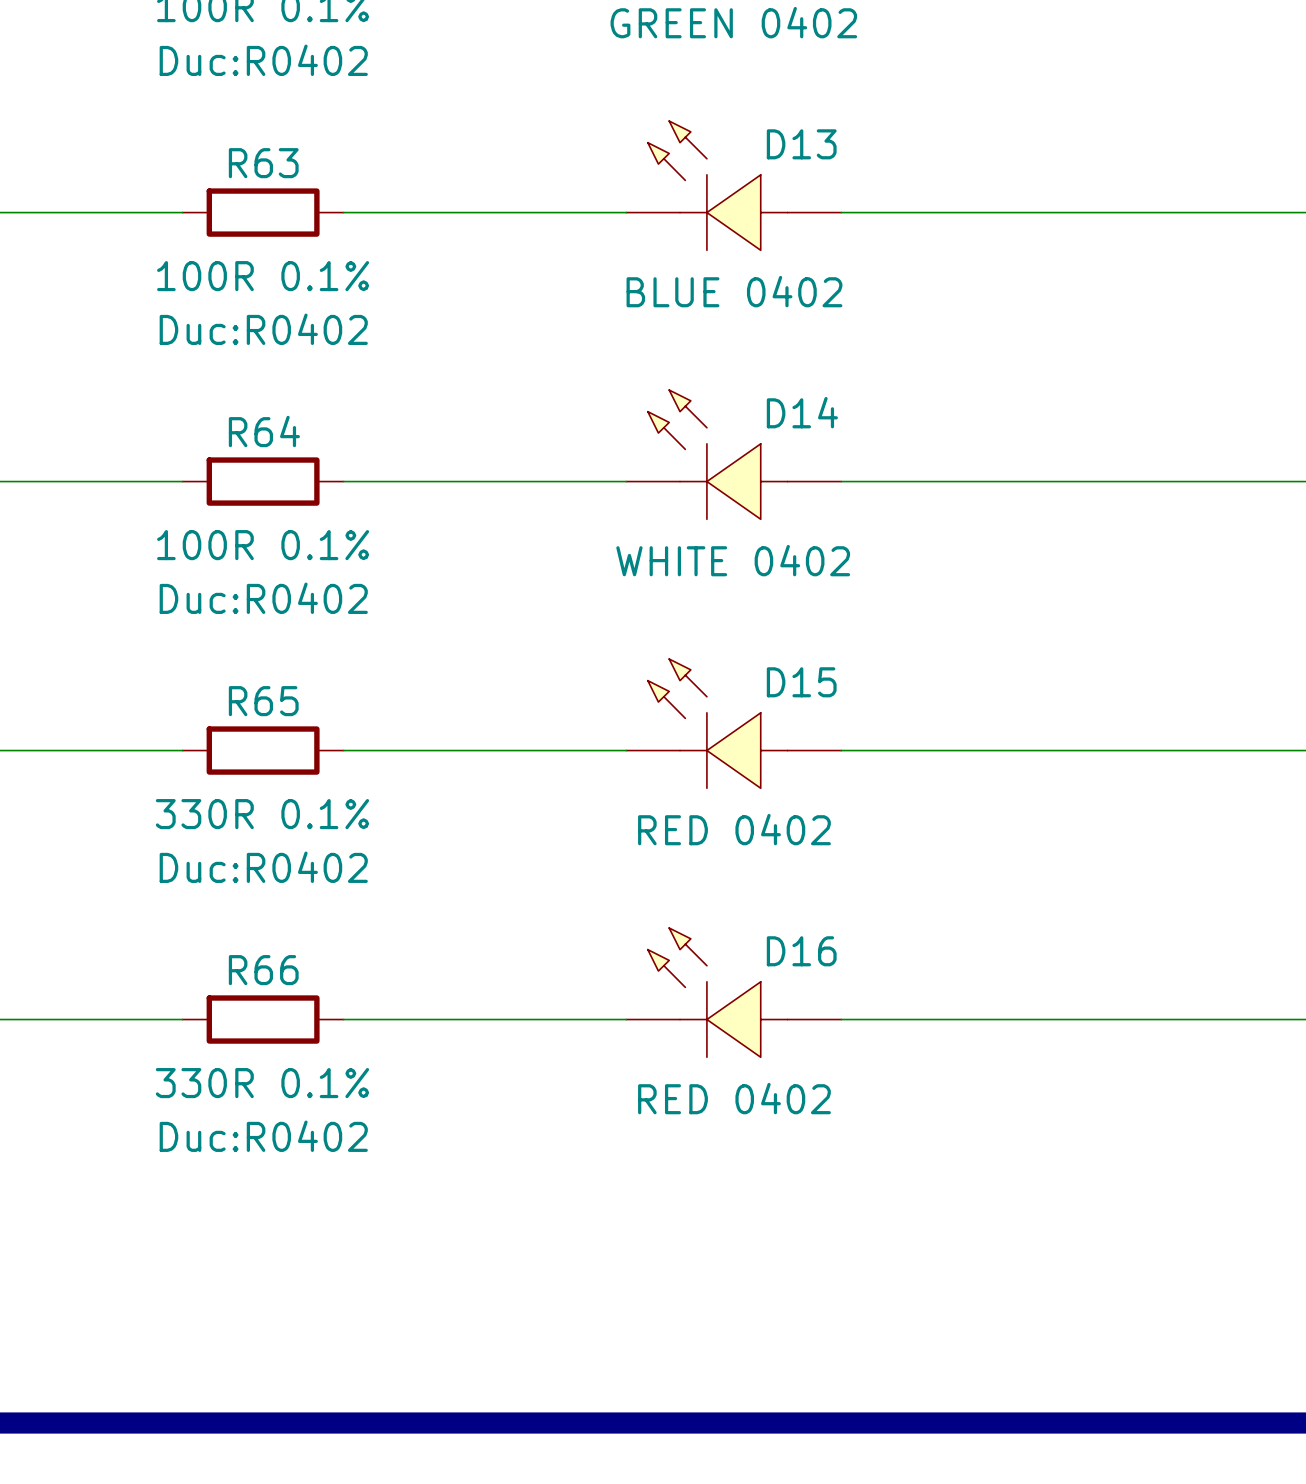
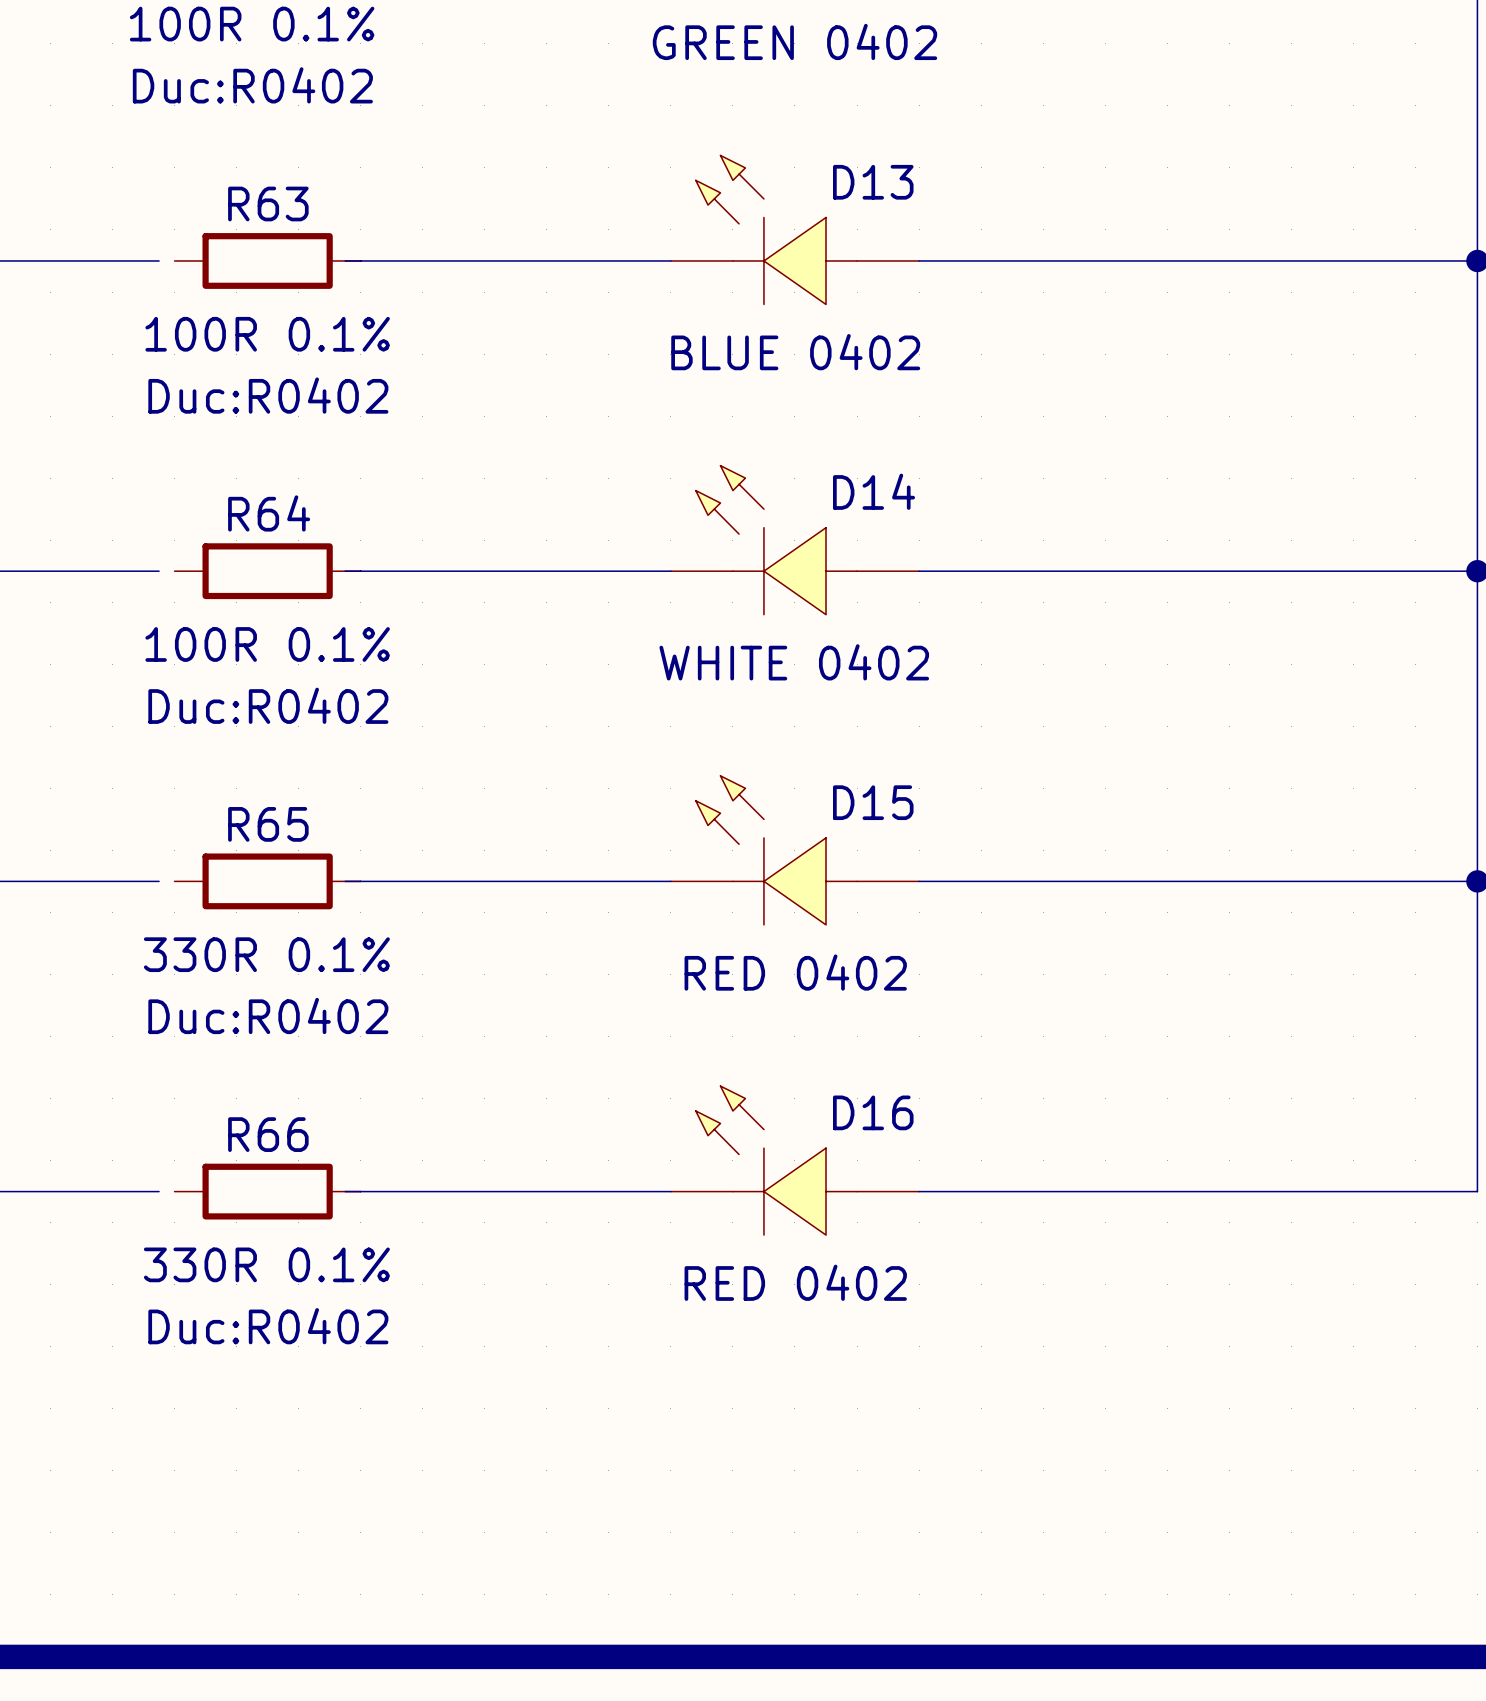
R63 position: (263, 212) -> (267, 260)
R64 position: (263, 481) -> (267, 571)
R65 position: (263, 750) -> (267, 881)
R66 position: (263, 1019) -> (267, 1191)

